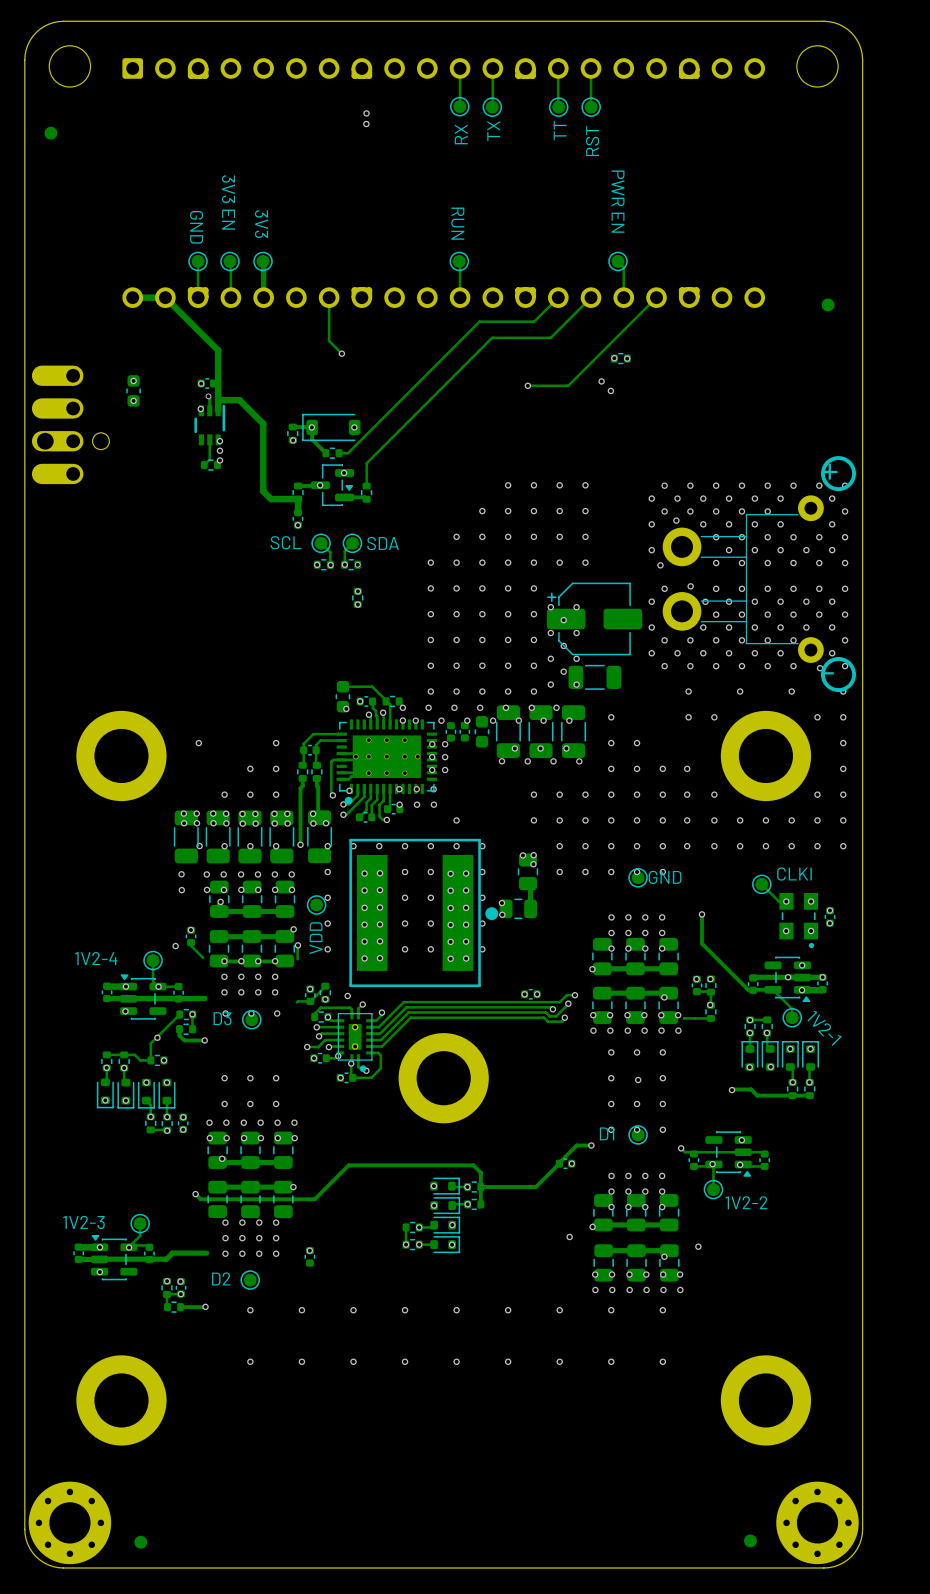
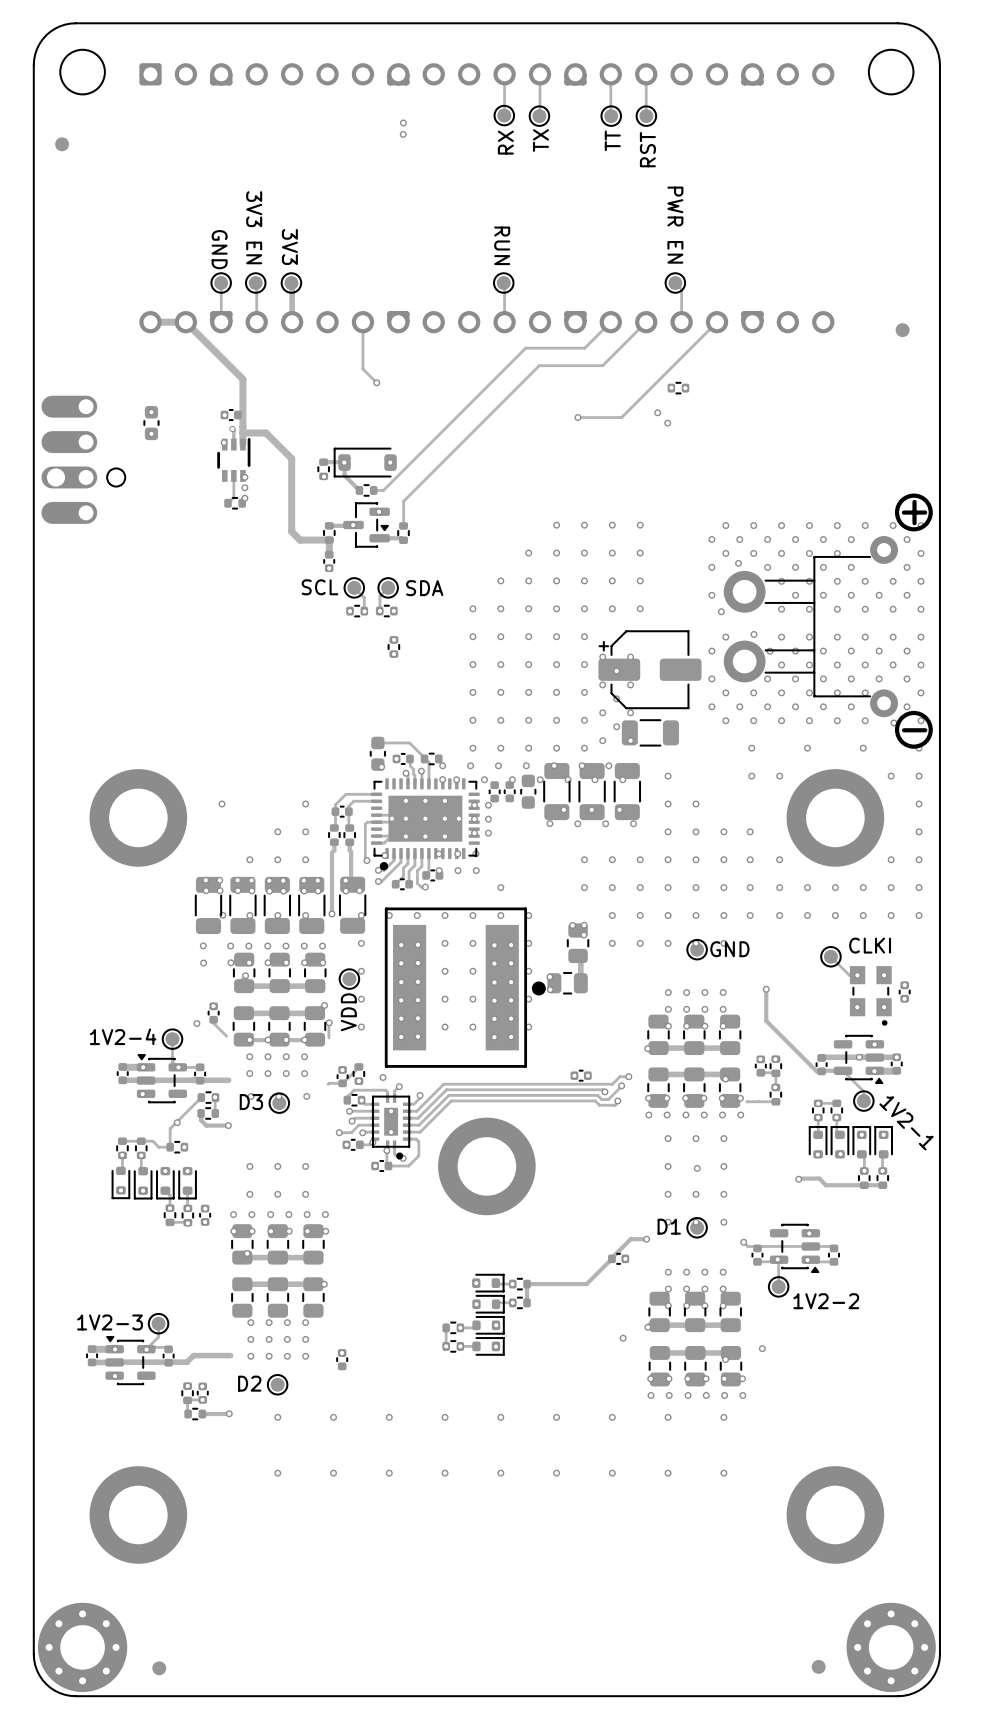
track: (480, 1187) (480, 1172) (473, 1165) (348, 1165) (314, 1199) (200, 1199) (195, 1194) -> none
via: (195, 1194) -> none

